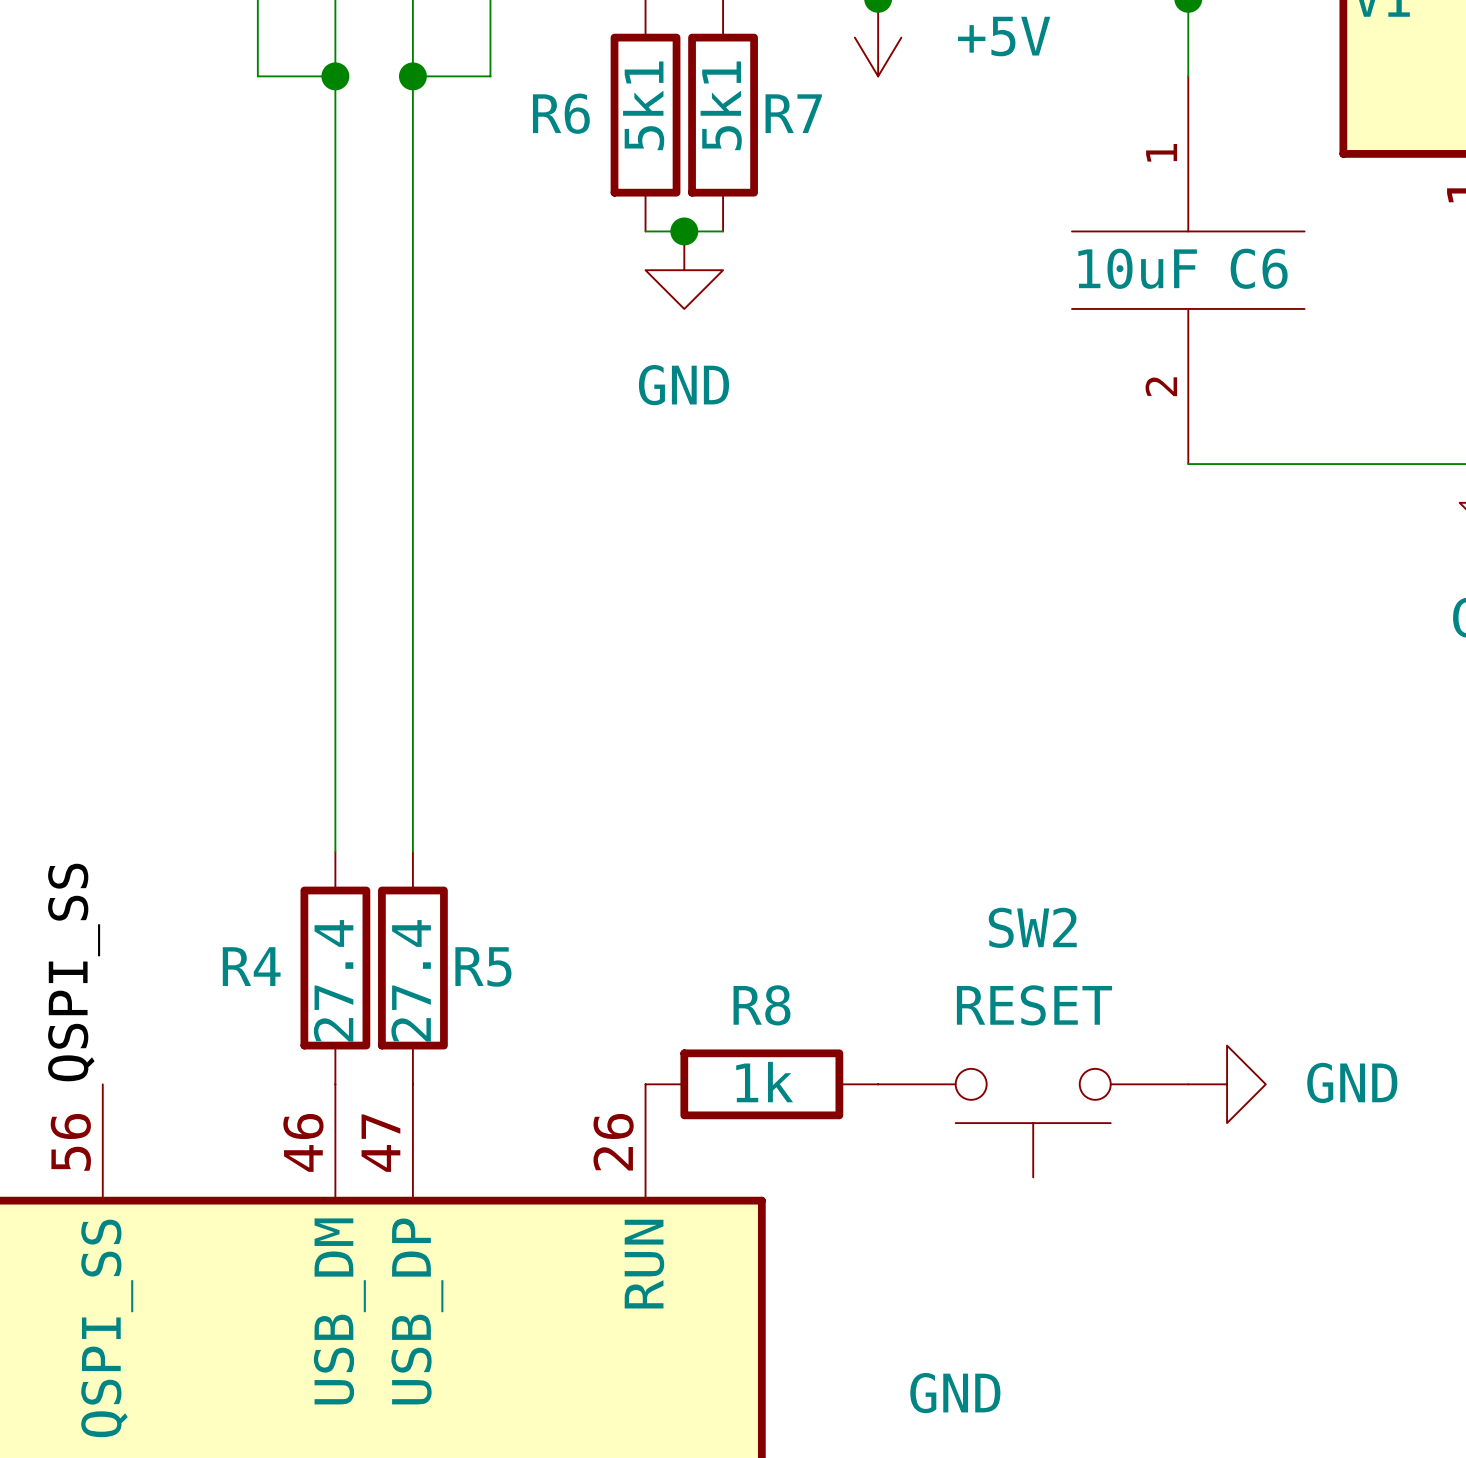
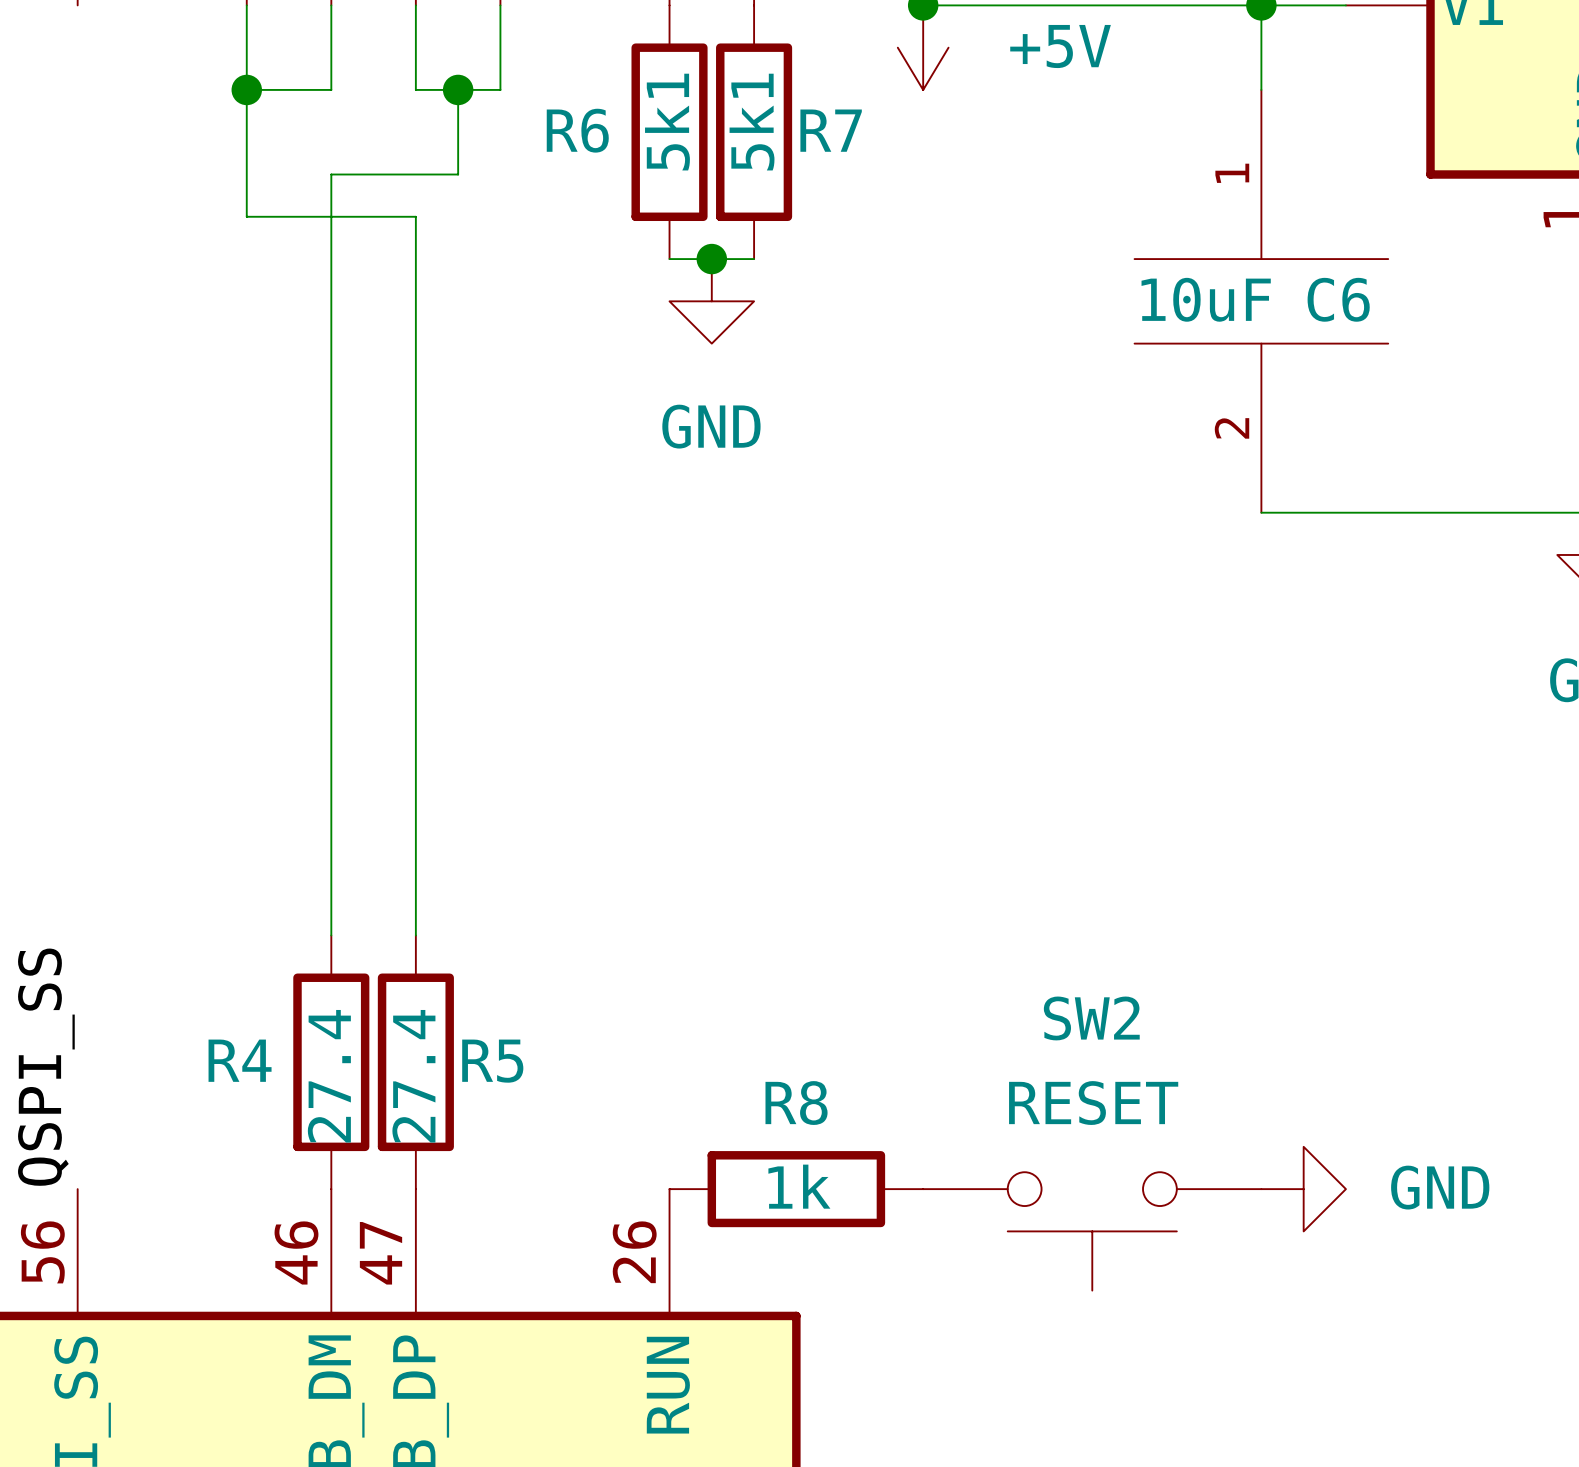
junction: none -> (246, 89)
wire: (335, 76) (335, 153) -> (458, 89) (458, 174) (331, 174)
junction: (335, 76) -> none
wire: (412, 76) (412, 192) -> (246, 89) (246, 216) (415, 216)
junction position: (412, 76) -> (458, 89)

